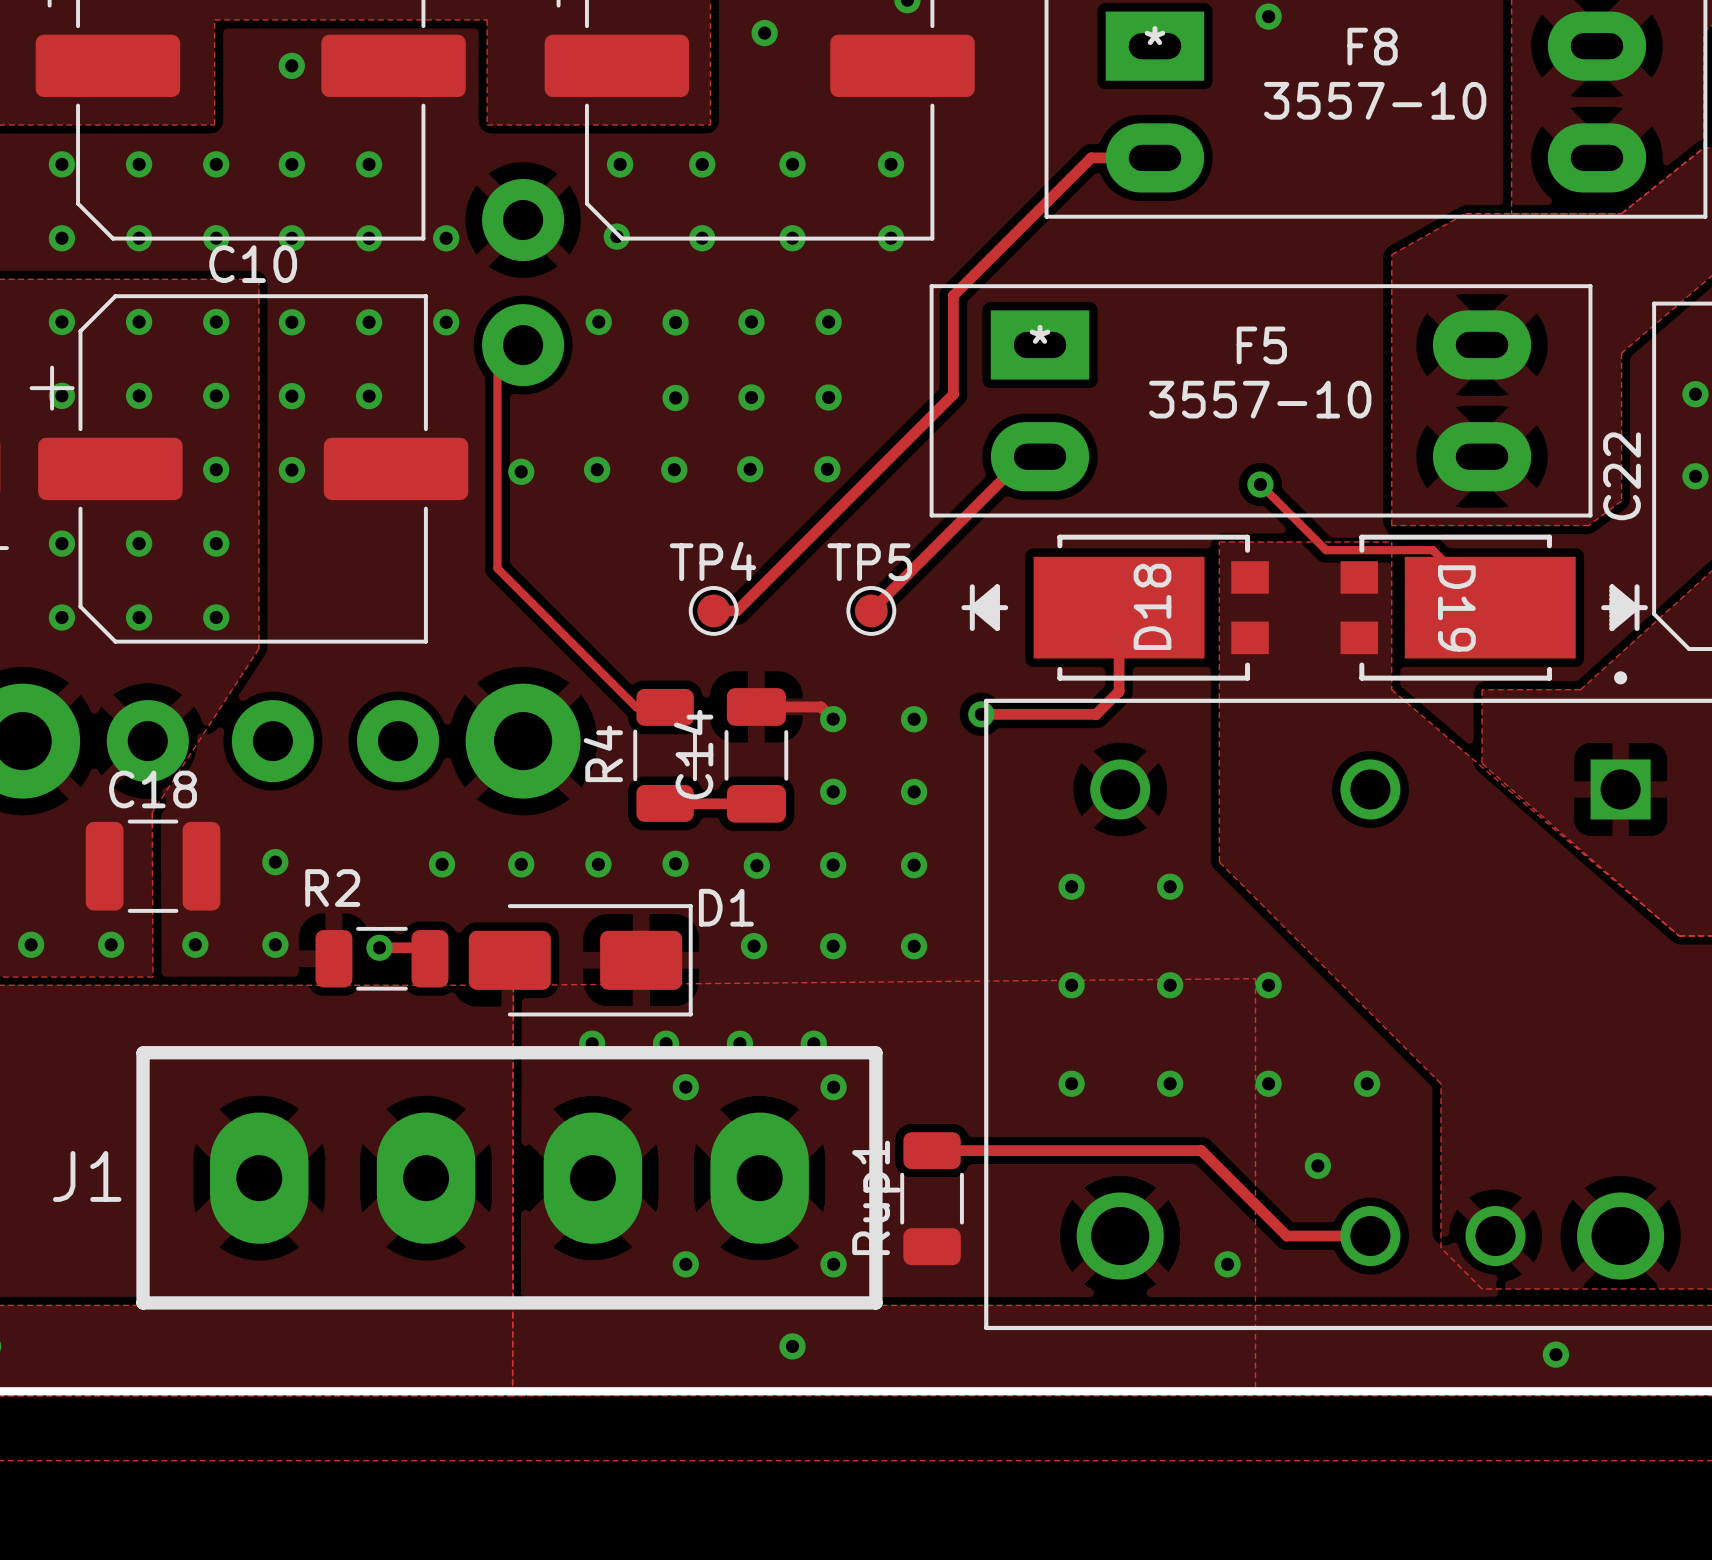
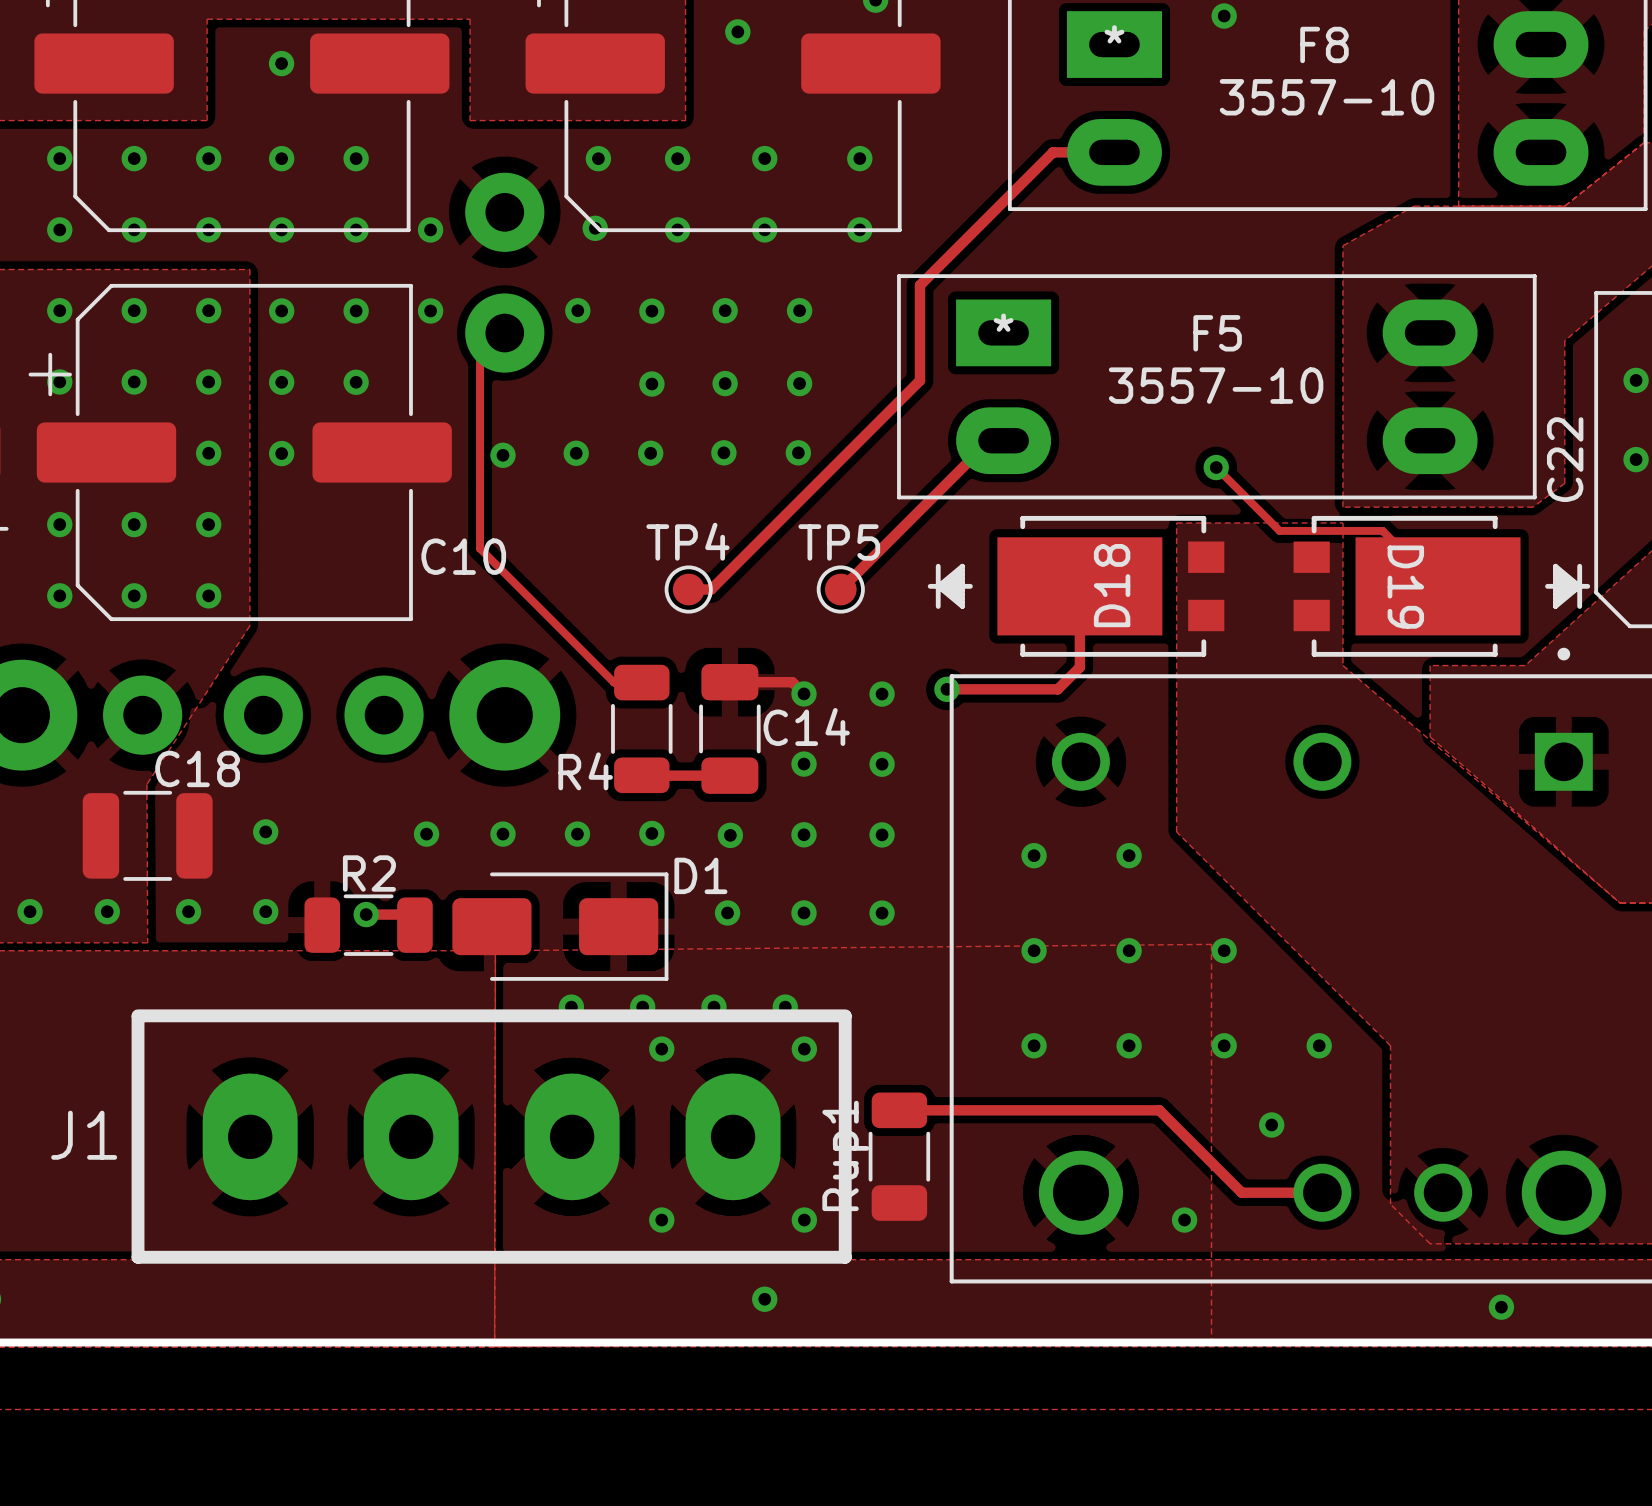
C10 name position: C10 (253, 264) -> C10 (463, 556)
R4 name rotation: 0° (603, 753) -> 90° clockwise (585, 771)
C14 name rotation: 0° (693, 754) -> 90° clockwise (806, 726)
C14 name position: C14 (693, 754) -> C14 (806, 726)
C18 name position: C18 (153, 789) -> C18 (197, 768)
R2 name position: R2 (332, 888) -> R2 (369, 873)

